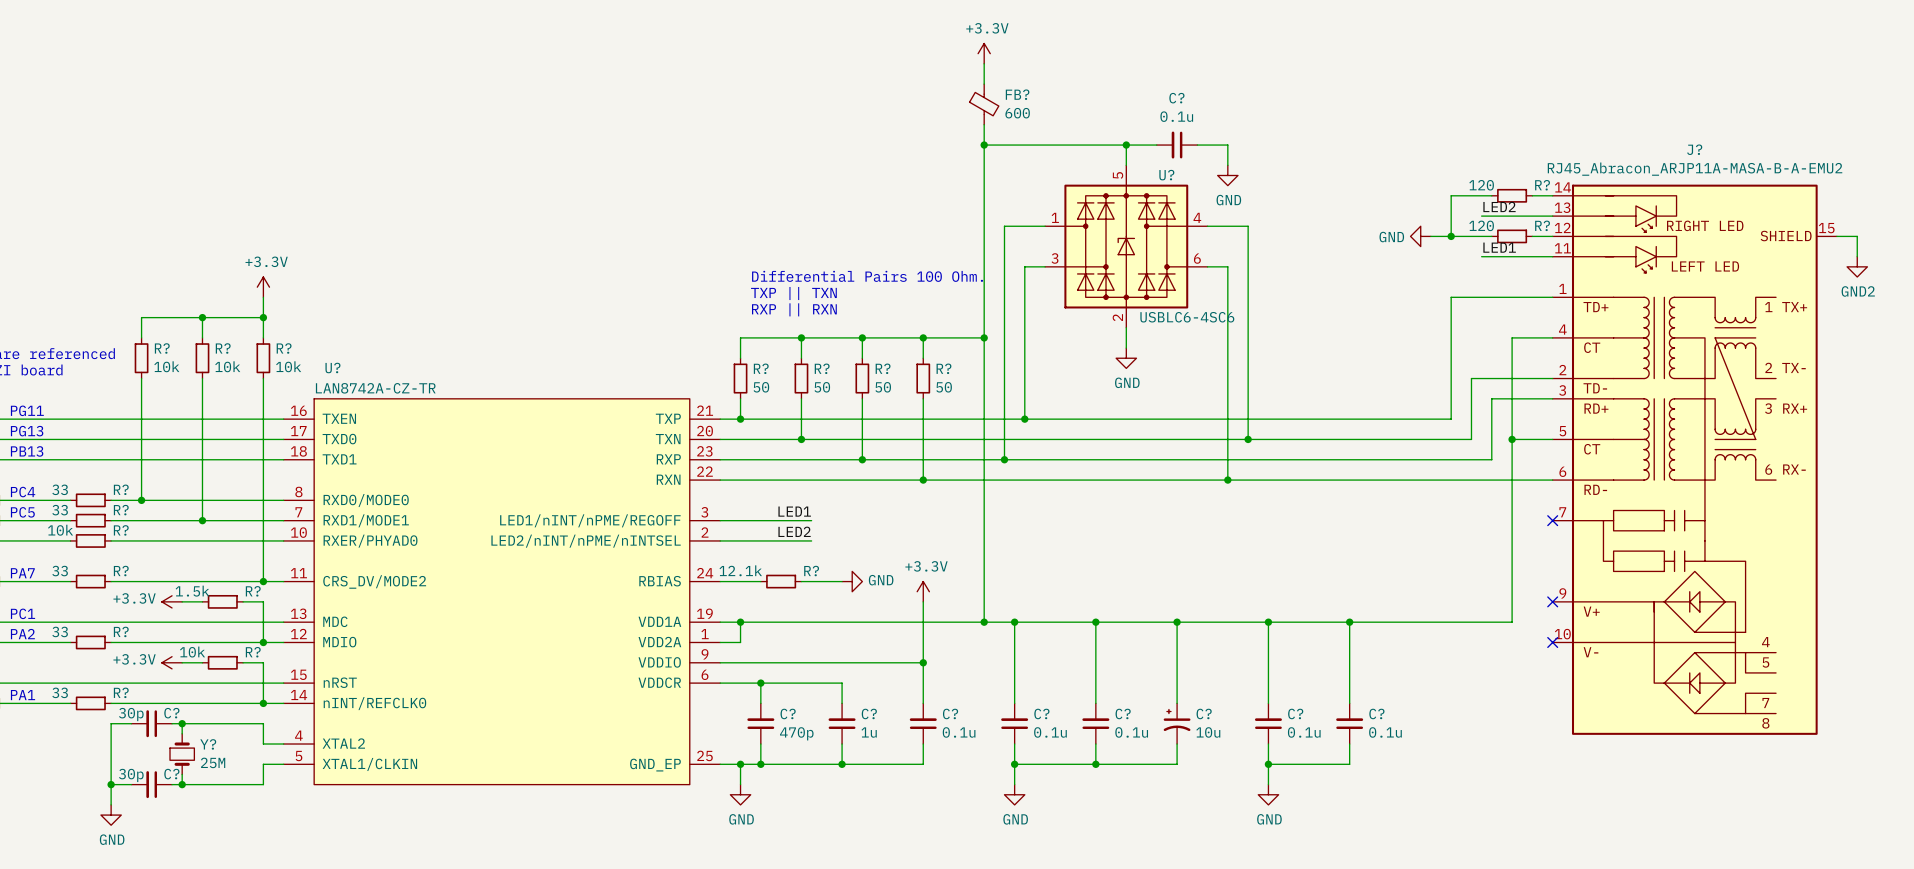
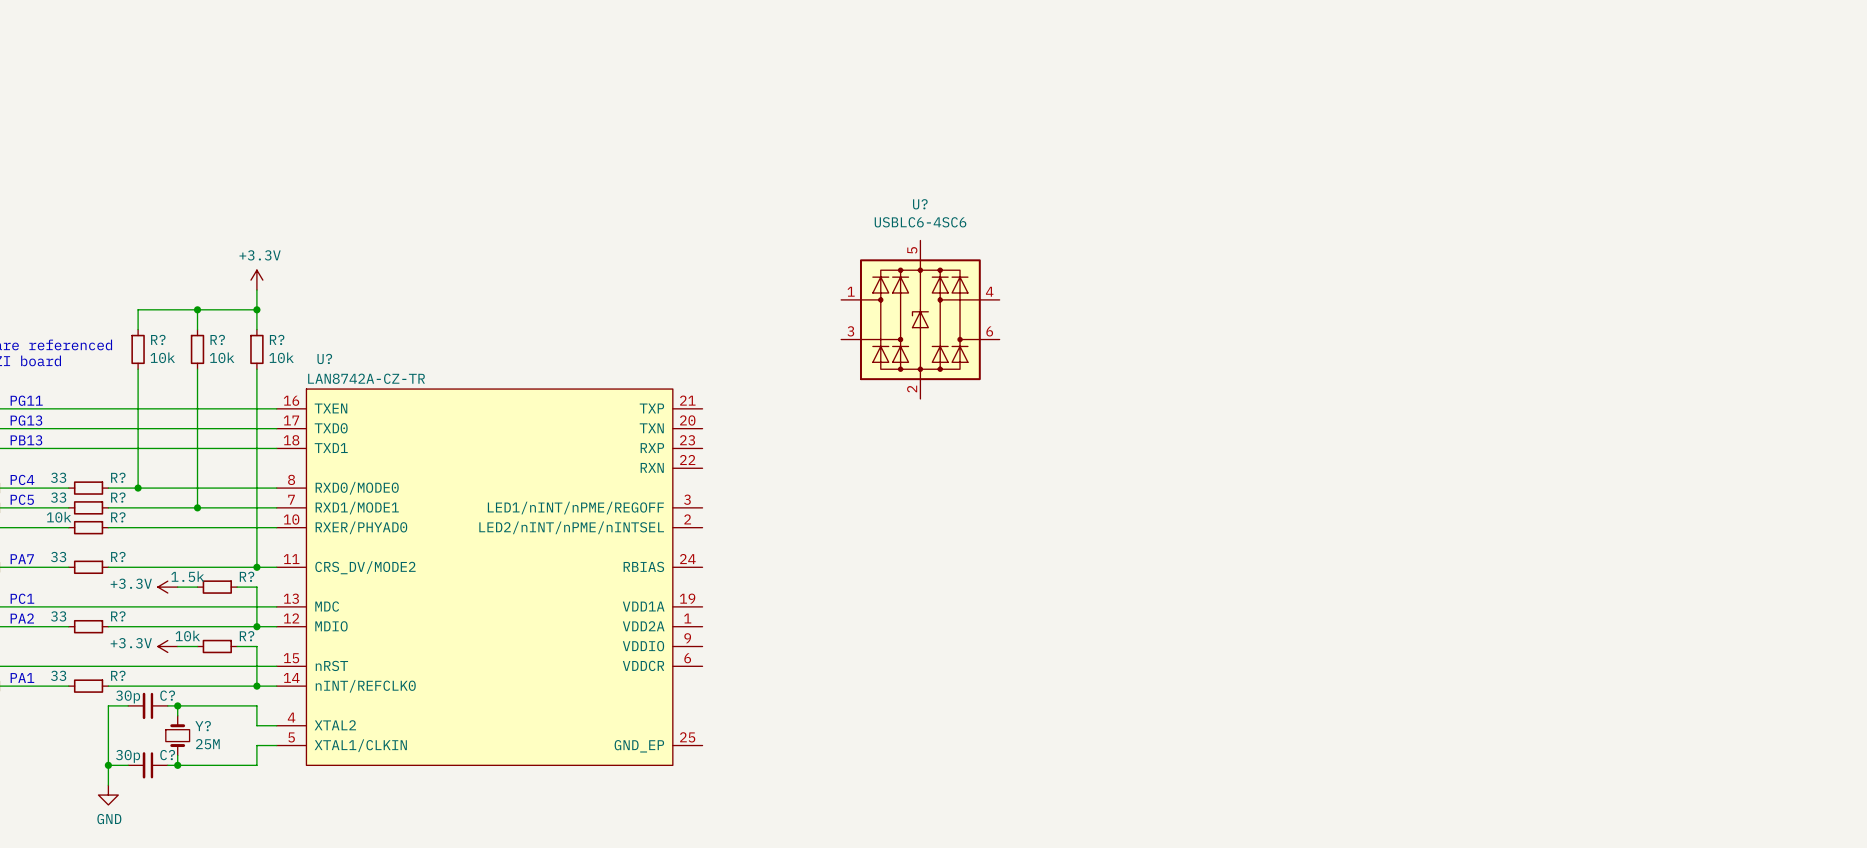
power symbol: +3.3V (984, 53) -> none
wire: (984, 63) (984, 84) -> none
FB?: 600 (984, 104) -> none
wire: (984, 124) (984, 622) -> none
wire: (984, 145) (1156, 145) -> none
junction: (984, 145) -> none
wire: (1126, 145) (1126, 165) -> none
junction: (1126, 145) -> none
C?: 0.1u (1177, 145) -> none
wire: (1197, 145) (1227, 145) (1227, 165) -> none
power symbol: GND (1227, 175) -> none
wire: (1491, 195) (1451, 195) (1451, 236) -> none
R?: 120 (1512, 195) -> none
wire: (1532, 195) (1552, 195) -> none
label: LED2 (1499, 206) -> none
wire: (1481, 216) (1552, 216) -> none
wire: (1045, 226) (1004, 226) (1004, 459) -> none
wire: (1207, 226) (1248, 226) (1248, 439) -> none
power symbol: GND (1420, 236) -> none
wire: (1430, 236) (1491, 236) -> none
junction: (1451, 236) -> none
R?: 120 (1512, 236) -> none
wire: (1532, 236) (1552, 236) -> none
wire: (1836, 236) (1857, 236) (1857, 256) -> none
U?: USBLC6-4SC6 (1126, 246) -> none
label: LED1 (1499, 247) -> none
wire: (1481, 256) (1552, 256) -> none
wire: (1045, 266) (1024, 266) (1024, 419) -> none
wire: (1207, 266) (1227, 266) (1227, 480) -> none
power symbol: GND2 (1857, 266) -> none
text: Differential Pairs 100 Ohm. (867, 276) -> none
text: TXP || TXN (793, 293) -> none
wire: (1552, 297) (1451, 297) (1451, 419) (720, 419) -> none
text: RXP || RXN (794, 309) -> none
U?: none -> USBLC6-4SC6 (920, 319)
wire: (1126, 327) (1126, 348) -> none
wire: (801, 337) (801, 358) -> none
junction: (801, 337) -> none
wire: (862, 337) (862, 358) -> none
junction: (862, 337) -> none
junction: (923, 337) -> none
wire: (984, 337) (740, 337) (740, 358) -> none
junction: (984, 337) -> none
wire: (1552, 337) (1512, 337) (1512, 622) (720, 622) -> none
power symbol: GND (1126, 358) -> none
R?: 50 (740, 378) -> none
R?: 50 (801, 378) -> none
R?: 50 (862, 378) -> none
R?: 50 (923, 378) -> none
wire: (1552, 378) (1471, 378) (1471, 439) (720, 439) -> none
wire: (740, 398) (740, 419) -> none
wire: (801, 398) (801, 439) -> none
wire: (862, 398) (862, 459) -> none
wire: (923, 398) (923, 480) -> none
wire: (1552, 398) (1491, 398) (1491, 459) (720, 459) -> none
junction: (740, 419) -> none
junction: (1024, 419) -> none
junction: (801, 439) -> none
junction: (1248, 439) -> none
wire: (1512, 439) (1552, 439) -> none
junction: (1512, 439) -> none
junction: (862, 459) -> none
junction: (1004, 459) -> none
J?: RJ45_Abracon_ARJP11A-MASA-B-A-EMU2 (1694, 459) -> none
wire: (720, 480) (1552, 480) -> none
junction: (923, 480) -> none
junction: (1227, 480) -> none
label: LED1 (794, 511) -> none
wire: (720, 520) (811, 520) -> none
no-connect mark: (1552, 520) -> none
label: LED2 (794, 531) -> none
wire: (720, 540) (811, 540) -> none
wire: (720, 581) (760, 581) -> none
R?: 12.1k (781, 581) -> none
wire: (801, 581) (842, 581) -> none
power symbol: GND (852, 581) -> none
power symbol: +3.3V (923, 591) -> none
wire: (923, 601) (923, 703) -> none
no-connect mark: (1552, 601) -> none
wire: (740, 622) (740, 642) (720, 642) -> none
junction: (740, 622) -> none
junction: (984, 622) -> none
wire: (1014, 622) (1014, 703) -> none
junction: (1014, 622) -> none
wire: (1095, 622) (1095, 703) -> none
junction: (1095, 622) -> none
wire: (1177, 622) (1177, 703) -> none
junction: (1177, 622) -> none
wire: (1268, 622) (1268, 703) -> none
junction: (1268, 622) -> none
wire: (1349, 622) (1349, 703) -> none
junction: (1349, 622) -> none
no-connect mark: (1552, 642) -> none
wire: (720, 662) (923, 662) -> none
junction: (923, 662) -> none
wire: (720, 683) (842, 683) (842, 703) -> none
wire: (760, 683) (760, 703) -> none
junction: (760, 683) -> none
C?: 470p (760, 723) -> none
C?: 1u (842, 723) -> none
C?: 0.1u (923, 723) -> none
C?: 0.1u (1014, 723) -> none
C?: 0.1u (1095, 723) -> none
C?: 10u (1177, 723) -> none
C?: 0.1u (1268, 723) -> none
C?: 0.1u (1349, 723) -> none
wire: (760, 744) (760, 764) -> none
wire: (842, 744) (842, 764) -> none
wire: (923, 744) (923, 764) (720, 764) -> none
wire: (1014, 744) (1014, 784) -> none
wire: (1095, 744) (1095, 764) -> none
wire: (1177, 744) (1177, 764) (1014, 764) -> none
wire: (1268, 744) (1268, 784) -> none
wire: (1349, 744) (1349, 764) (1268, 764) -> none
wire: (740, 764) (740, 784) -> none
junction: (740, 764) -> none
junction: (760, 764) -> none
junction: (842, 764) -> none
junction: (1014, 764) -> none
junction: (1095, 764) -> none
junction: (1268, 764) -> none
power symbol: GND (740, 794) -> none
power symbol: GND (1014, 794) -> none
power symbol: GND (1268, 794) -> none

